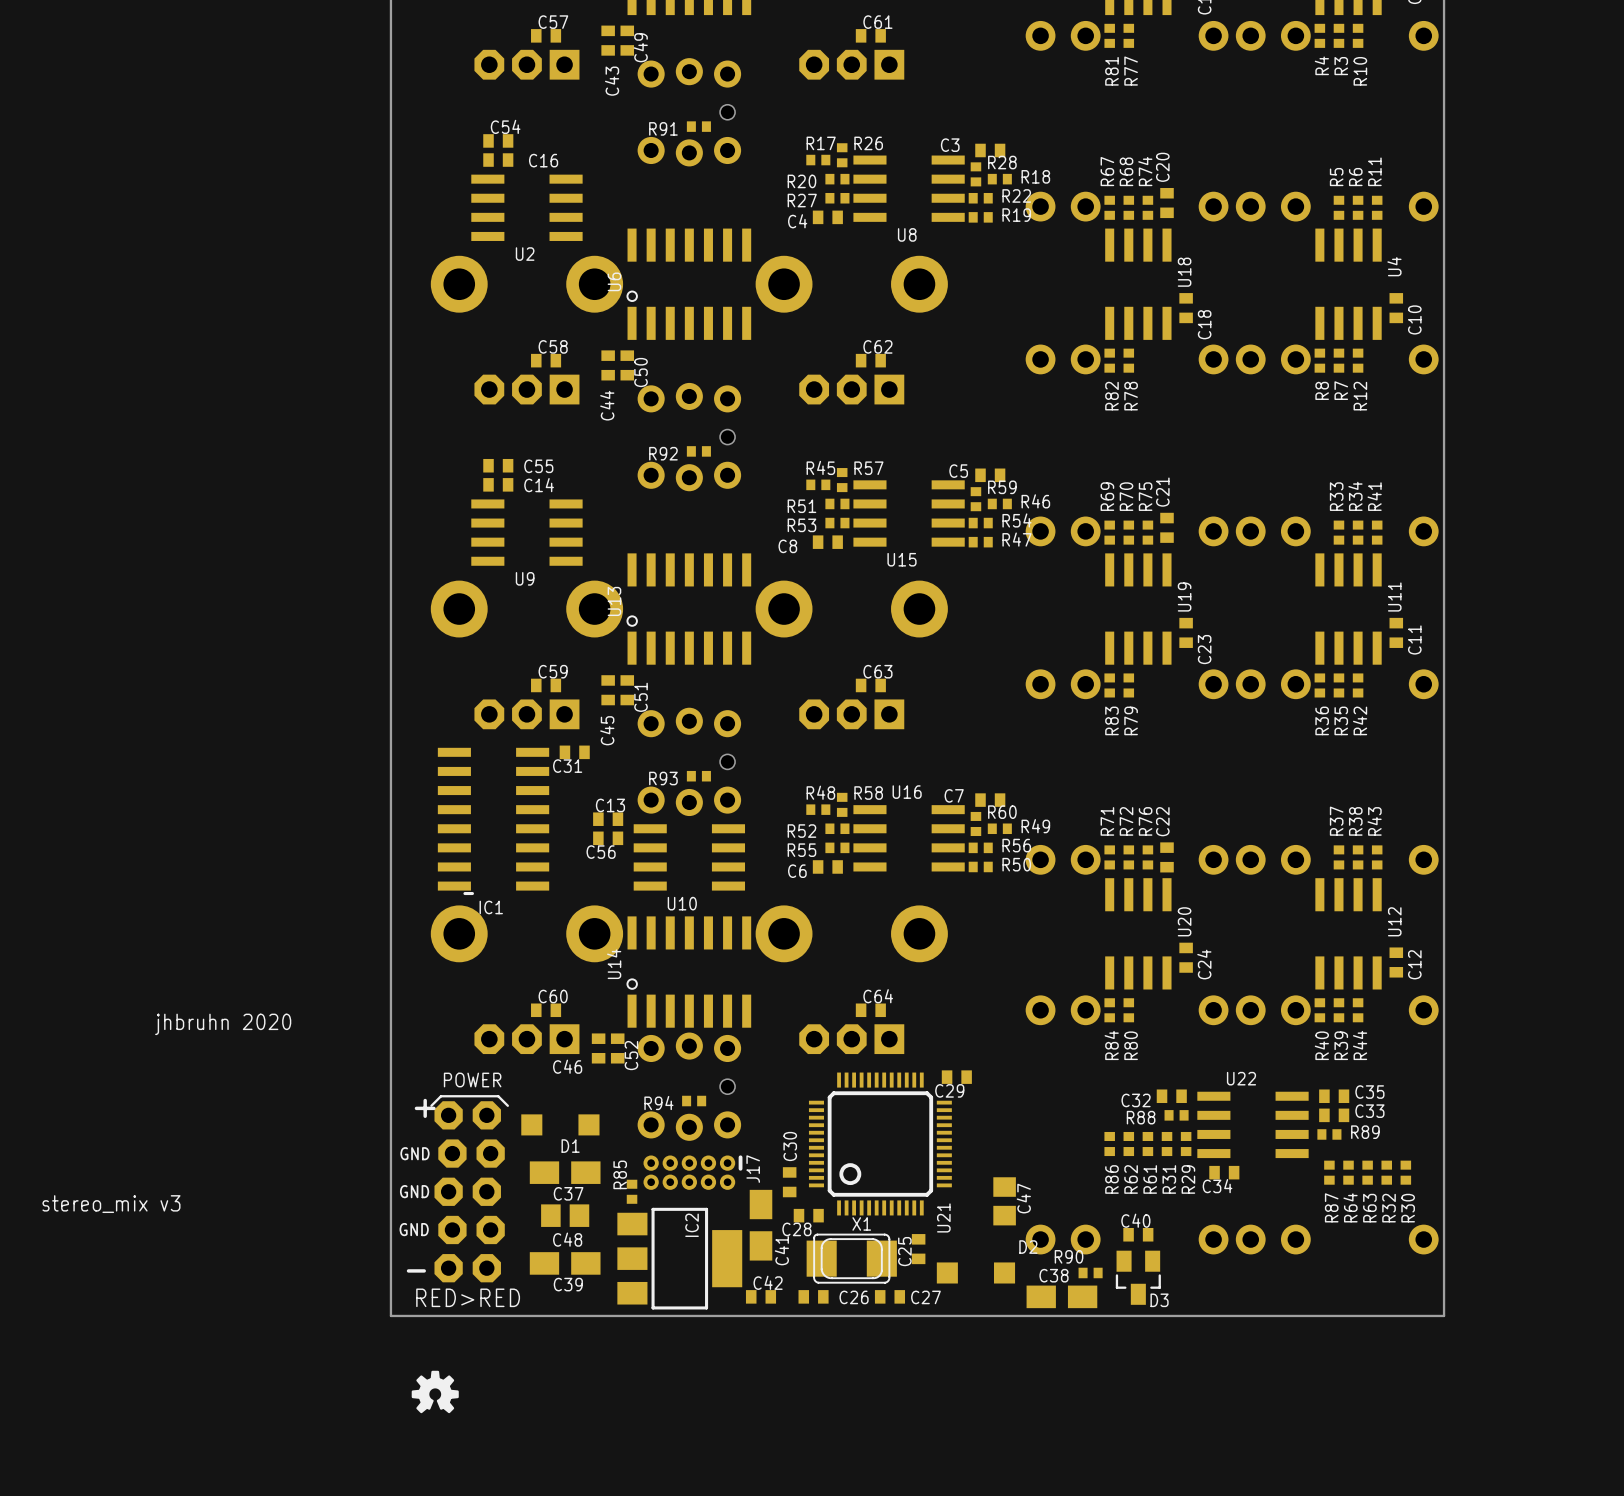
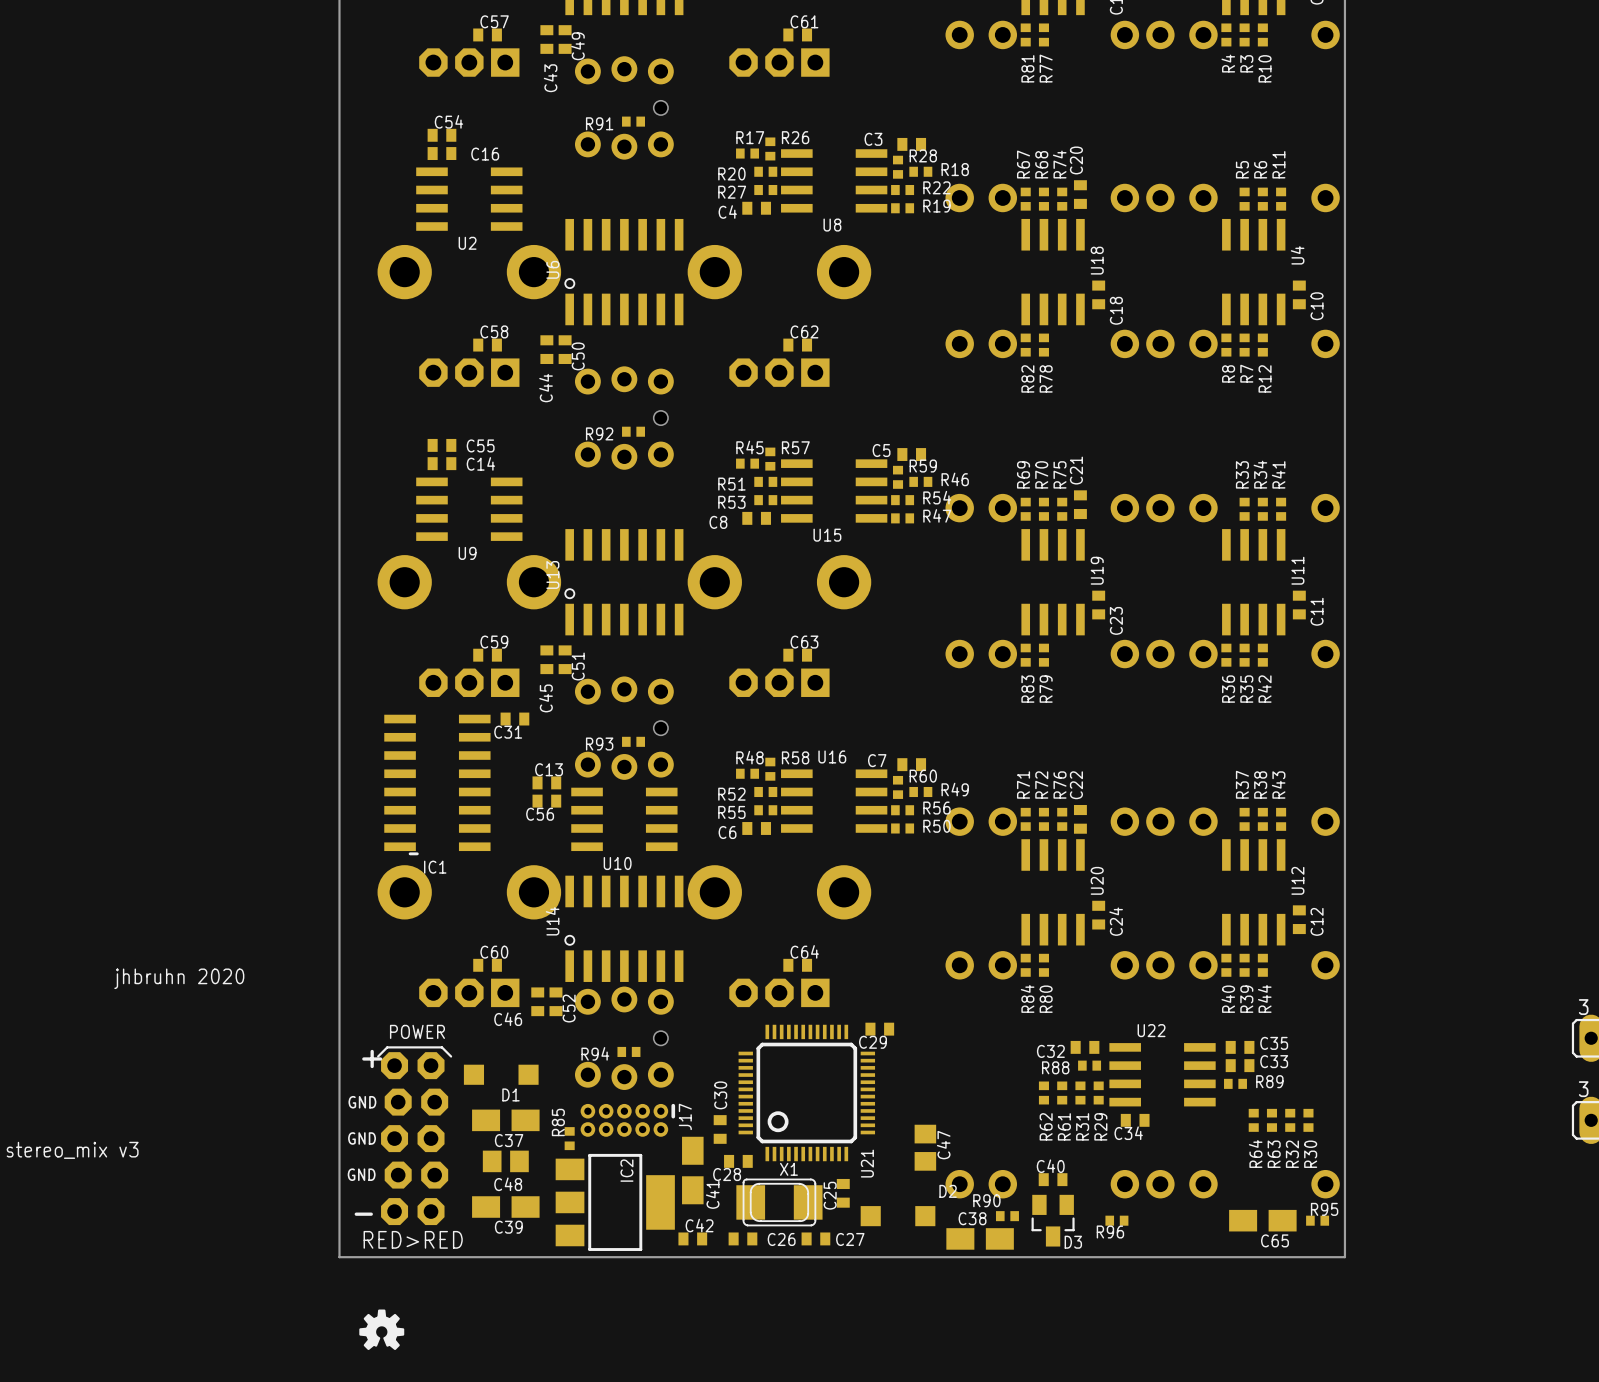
R86: (1109, 1144) -> none
R87: (1329, 1172) -> none
R96: none -> (1116, 1220)
C65: none -> (1262, 1220)
R95: none -> (1317, 1220)

